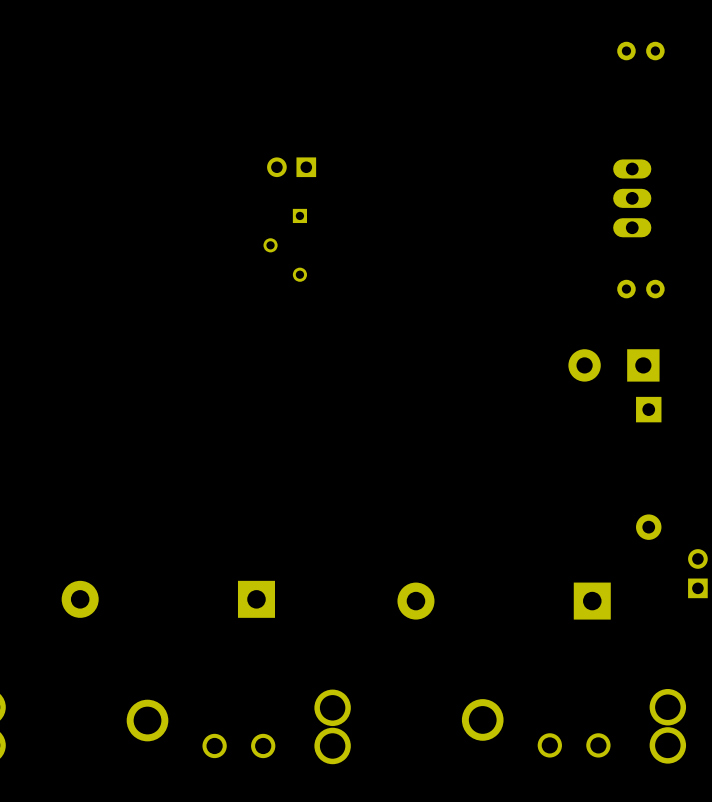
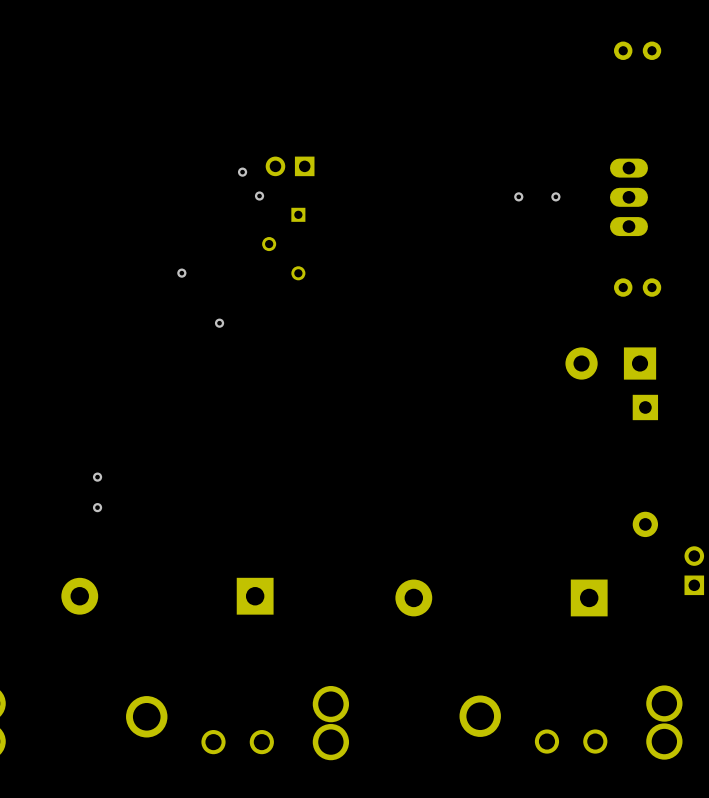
via: none -> (242, 172)
via: none -> (259, 196)
via: none -> (518, 196)
via: none -> (555, 196)
via: none -> (181, 273)
via: none -> (219, 323)
via: none -> (97, 477)
via: none -> (97, 507)

